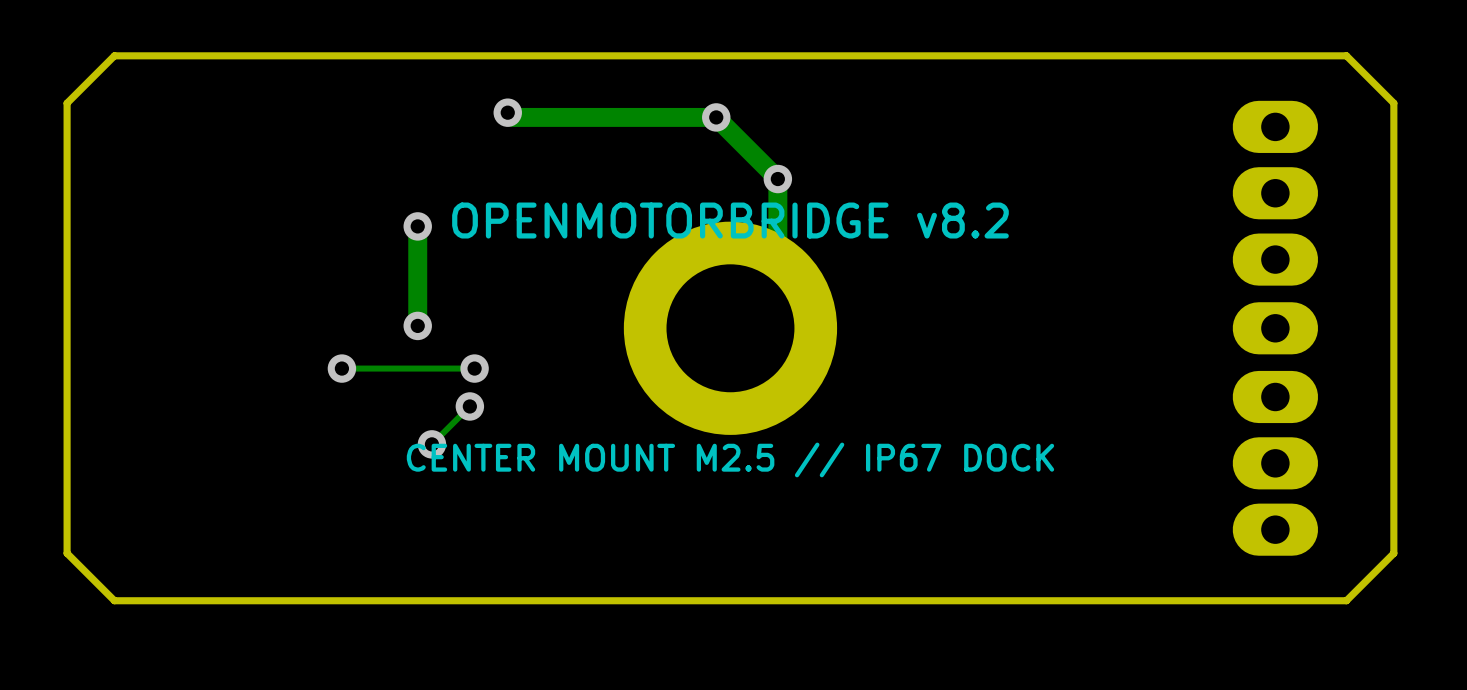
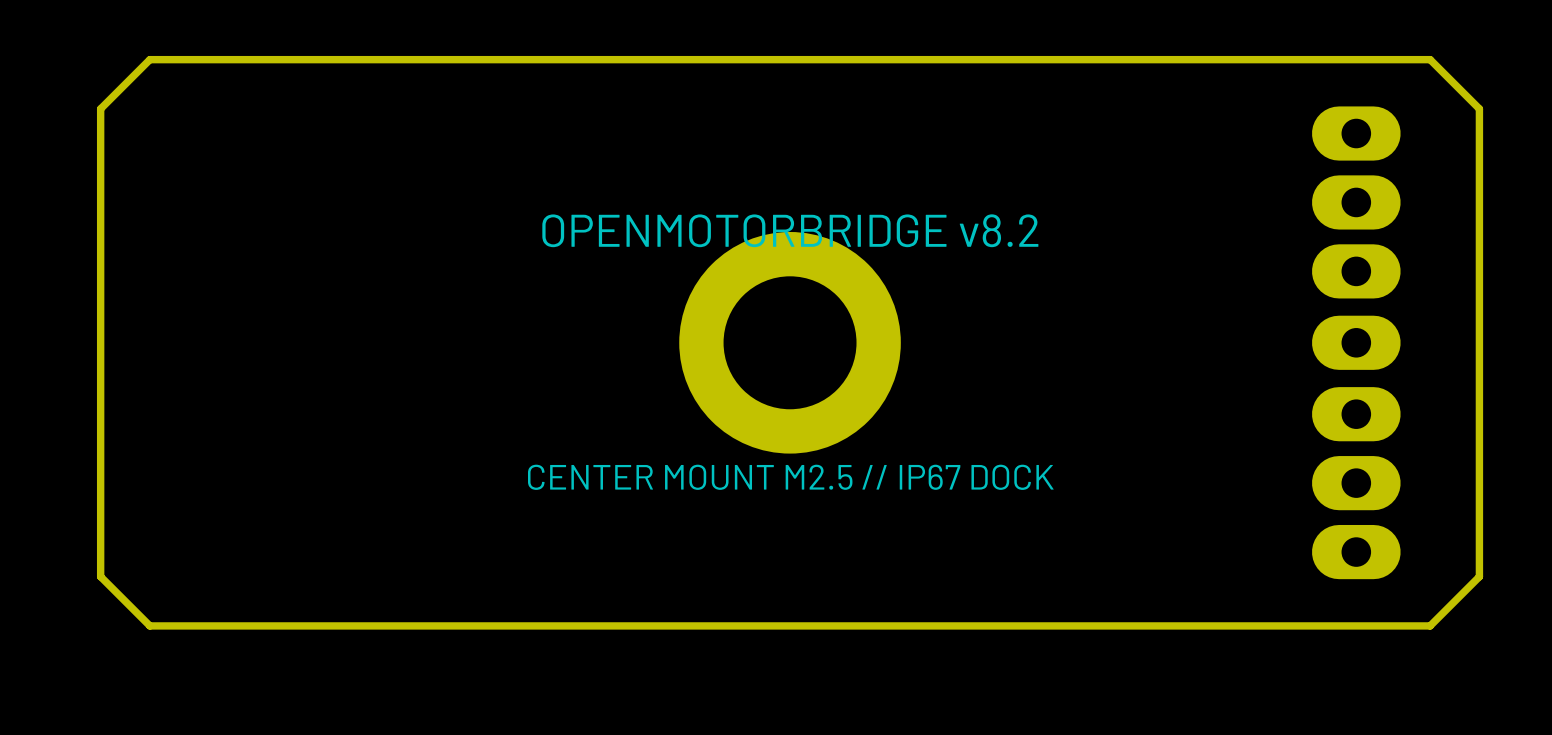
via: (507, 112) -> none
track: (512, 117) (716, 117) (777, 179) (777, 283) (730, 330) -> none
via: (716, 117) -> none
via: (777, 179) -> none
track: (417, 226) (417, 325) -> none
via: (417, 226) -> none
via: (417, 325) -> none
via: (341, 368) -> none
track: (474, 368) (341, 368) -> none
via: (474, 368) -> none
track: (469, 406) (431, 444) -> none
via: (469, 406) -> none
via: (431, 444) -> none

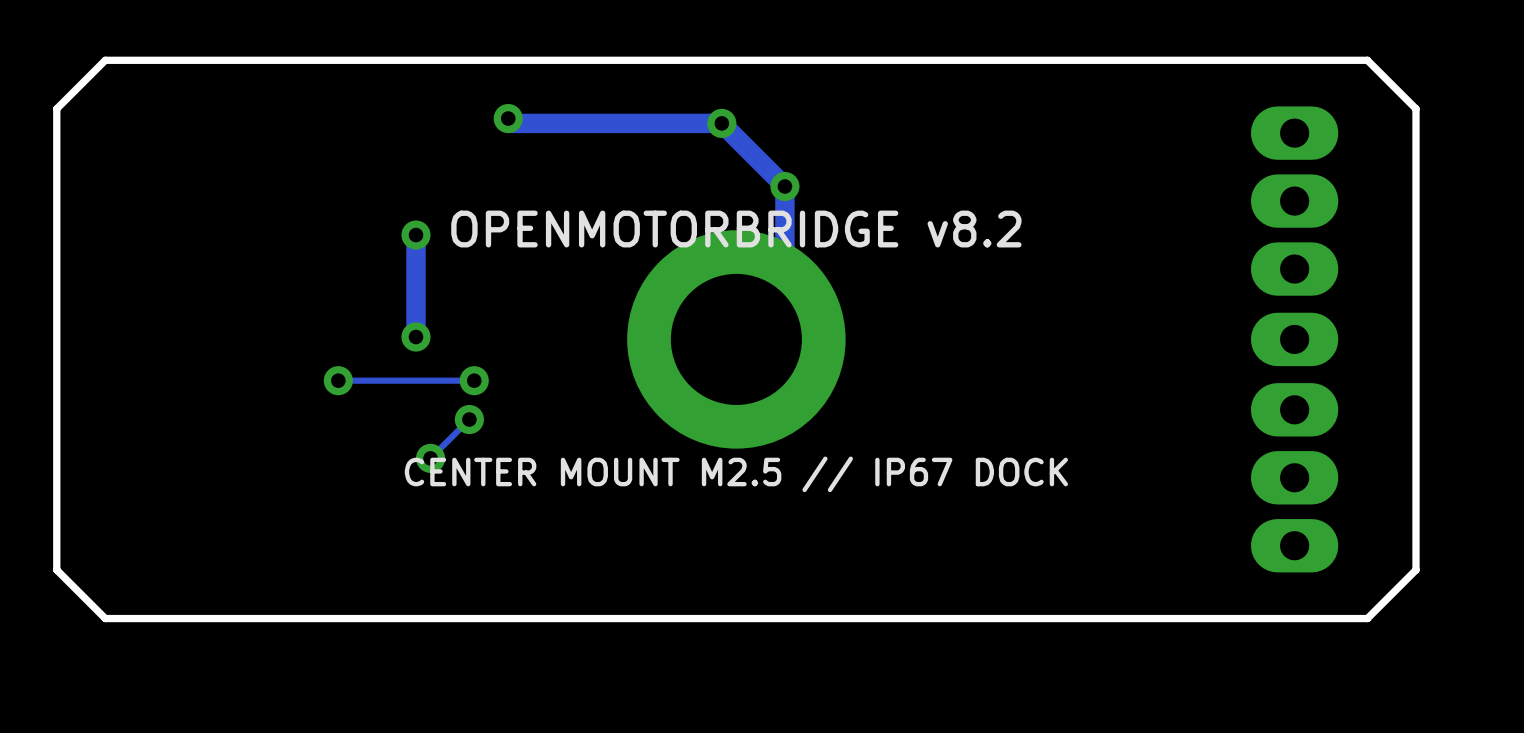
via: none -> (508, 118)
track: none -> (513, 123) (721, 123) (784, 186) (784, 293) (736, 341)
via: none -> (721, 123)
via: none -> (784, 186)
track: none -> (416, 235) (416, 336)
via: none -> (416, 235)
via: none -> (416, 336)
via: none -> (338, 380)
track: none -> (474, 380) (338, 380)
via: none -> (474, 380)
track: none -> (469, 419) (430, 458)
via: none -> (469, 419)
via: none -> (430, 458)

